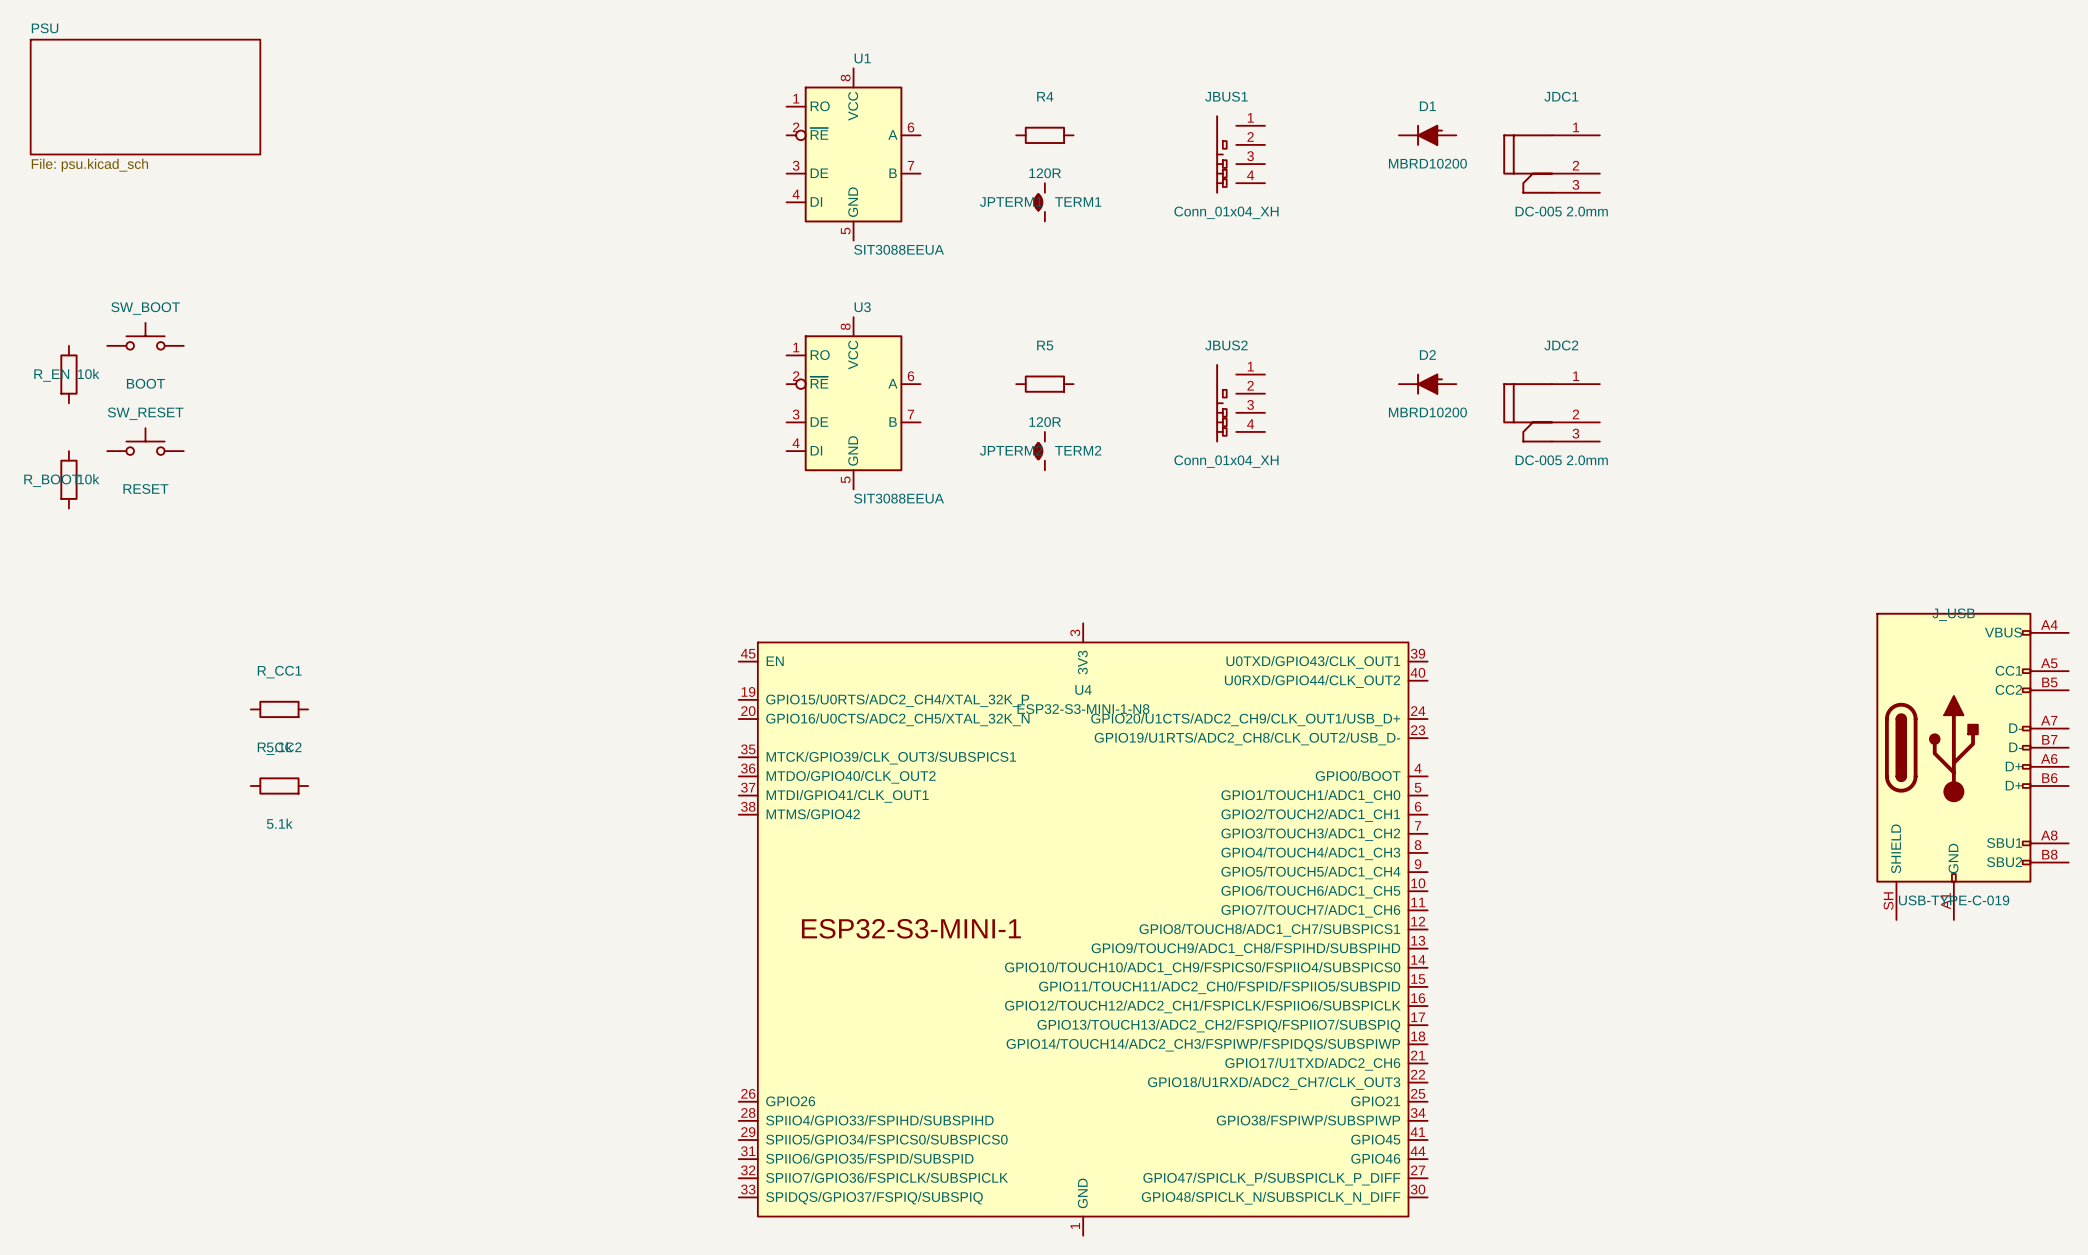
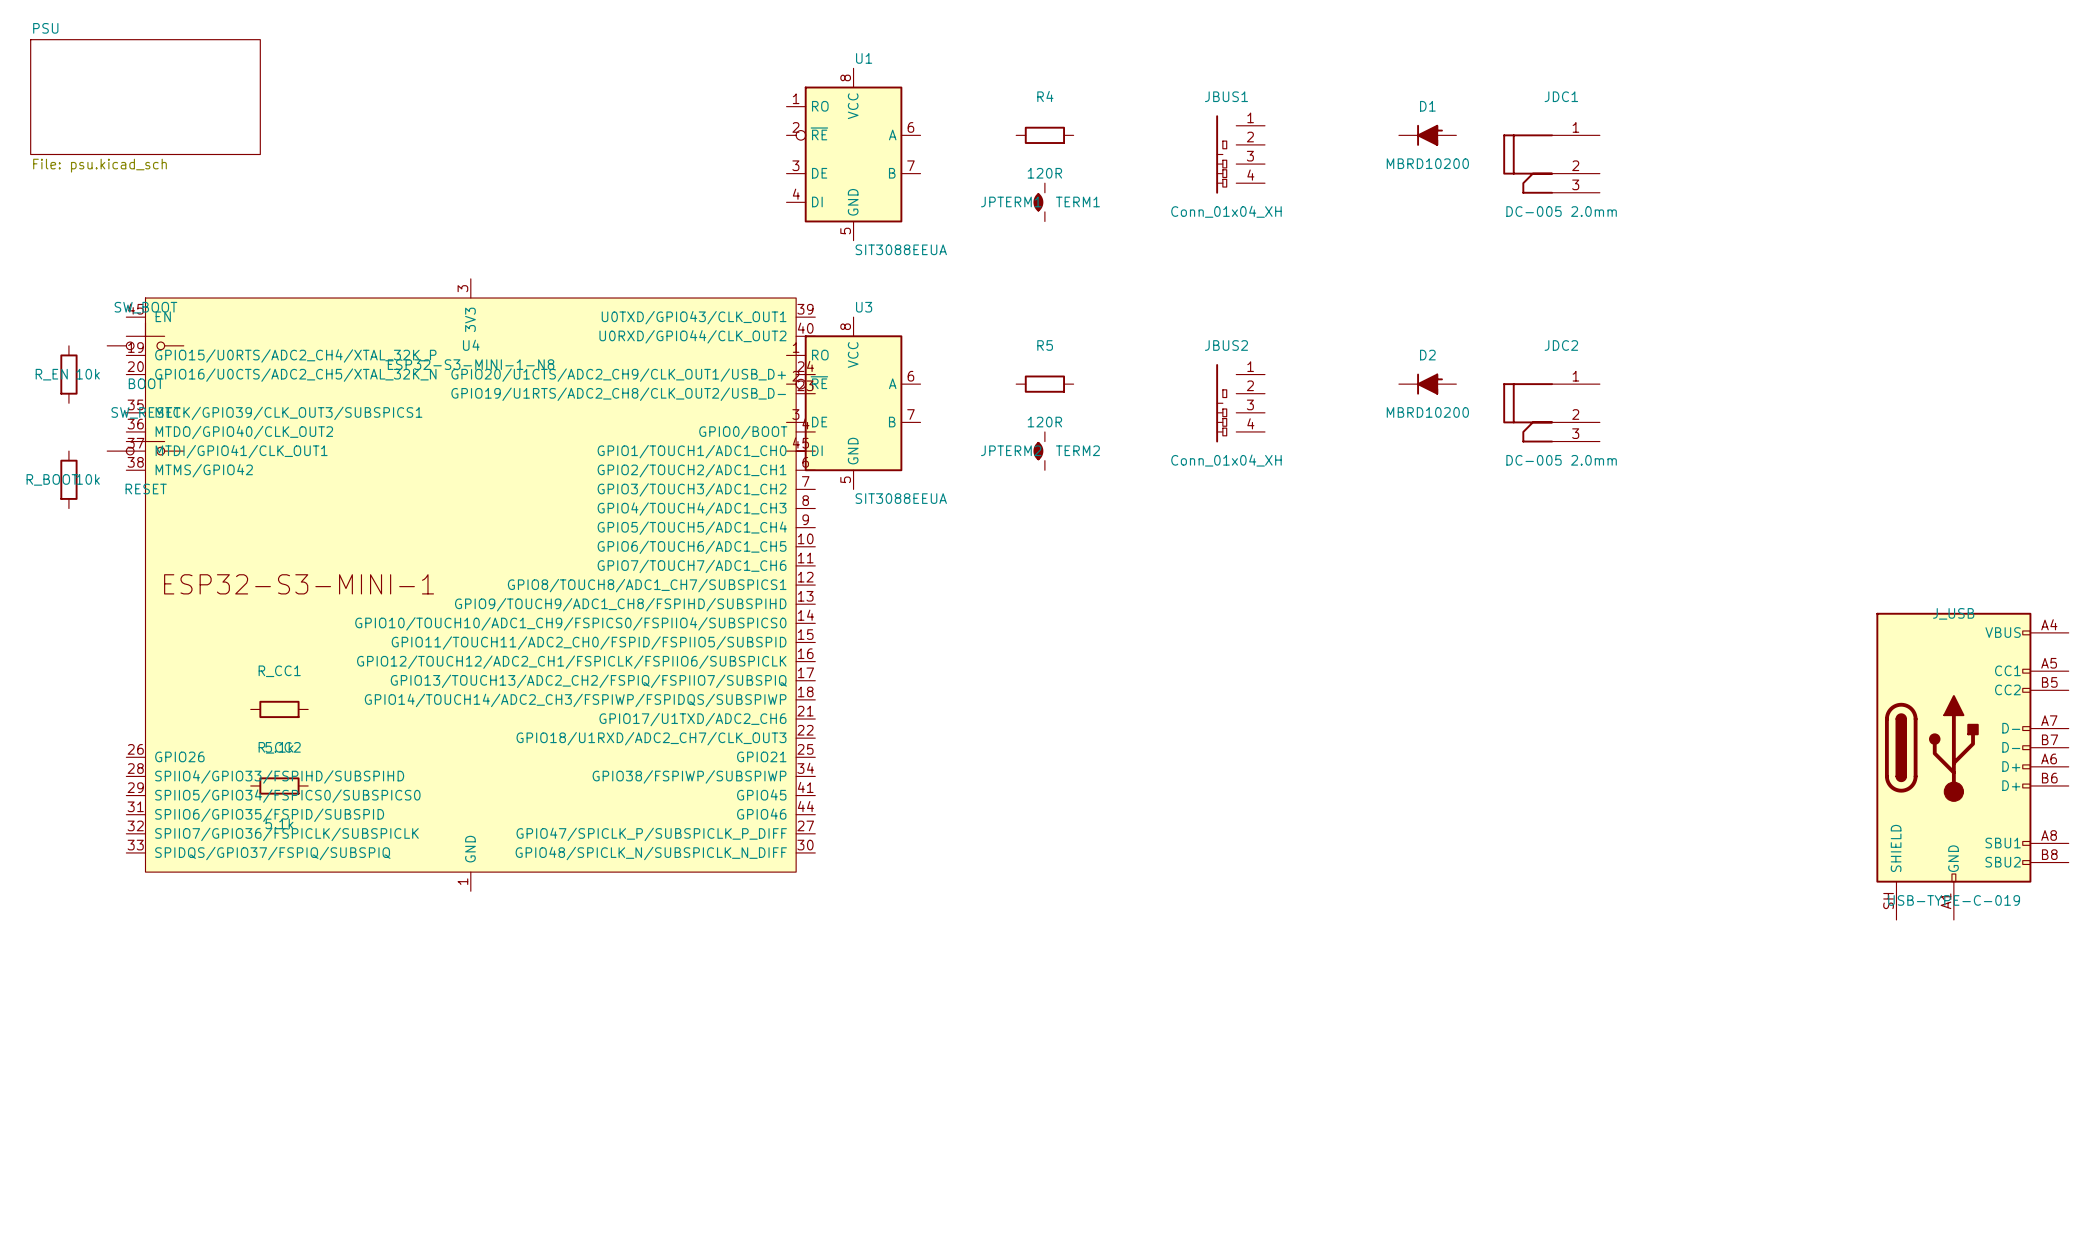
U4 position: (1083, 929) -> (470, 585)

